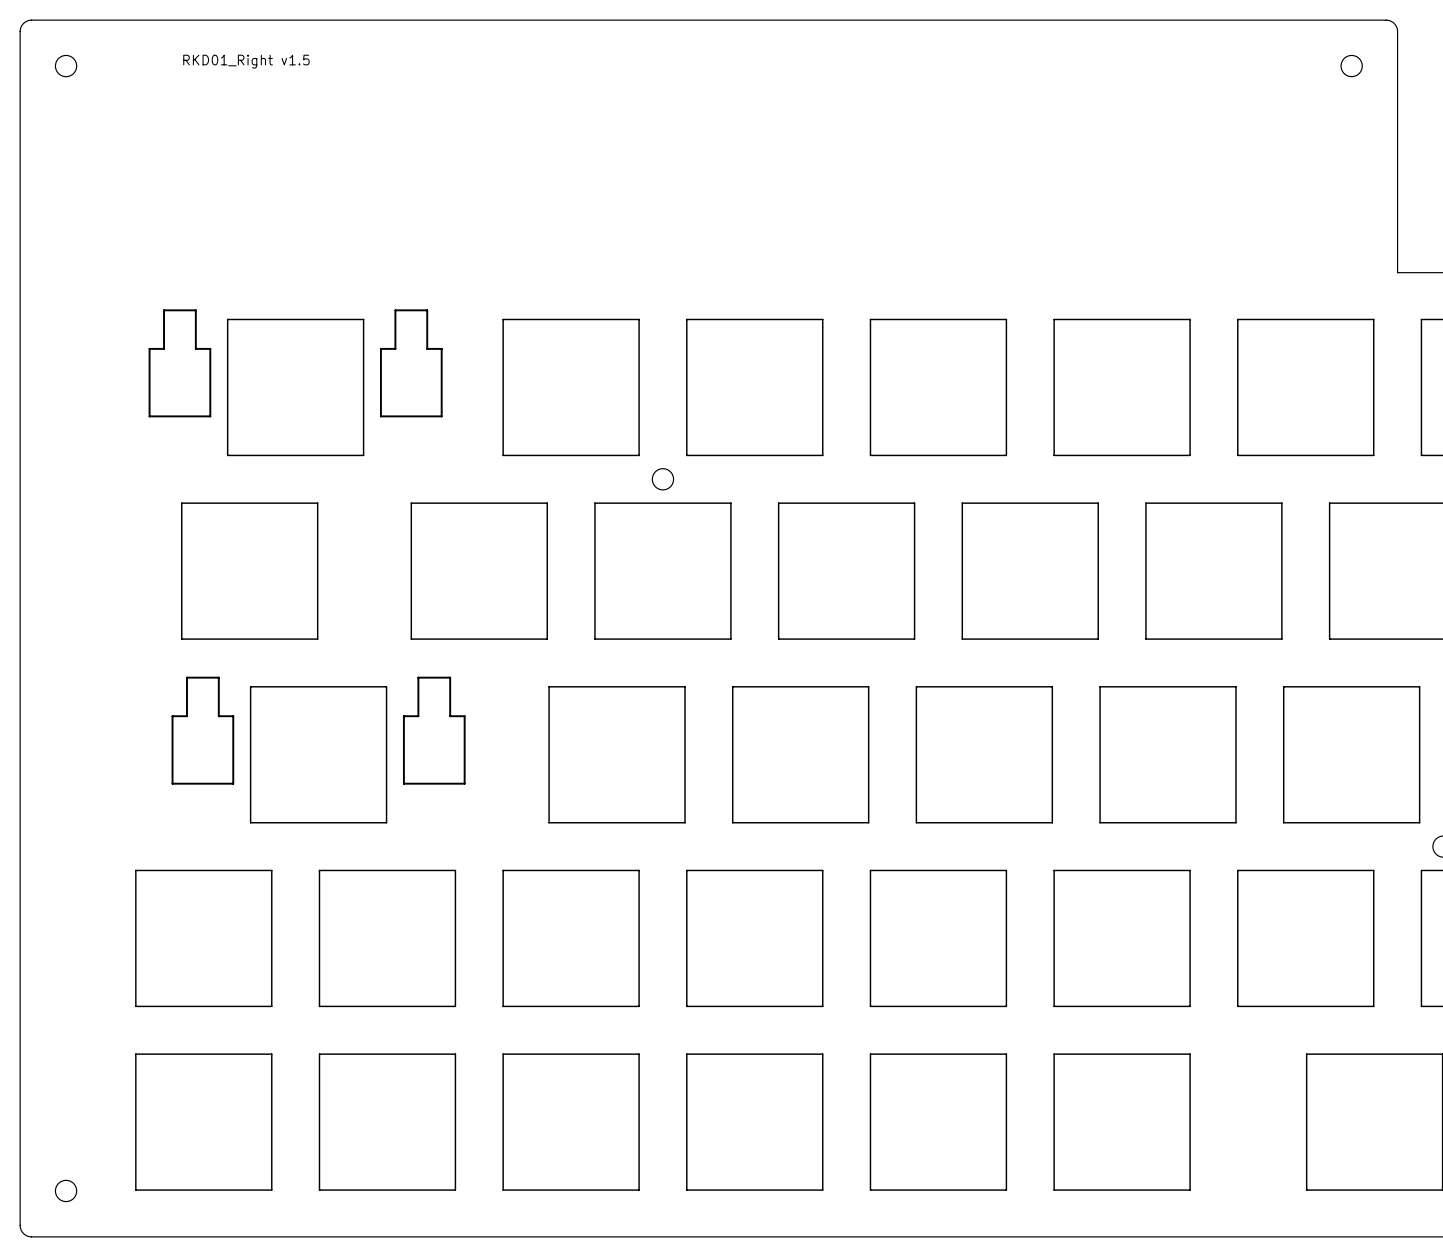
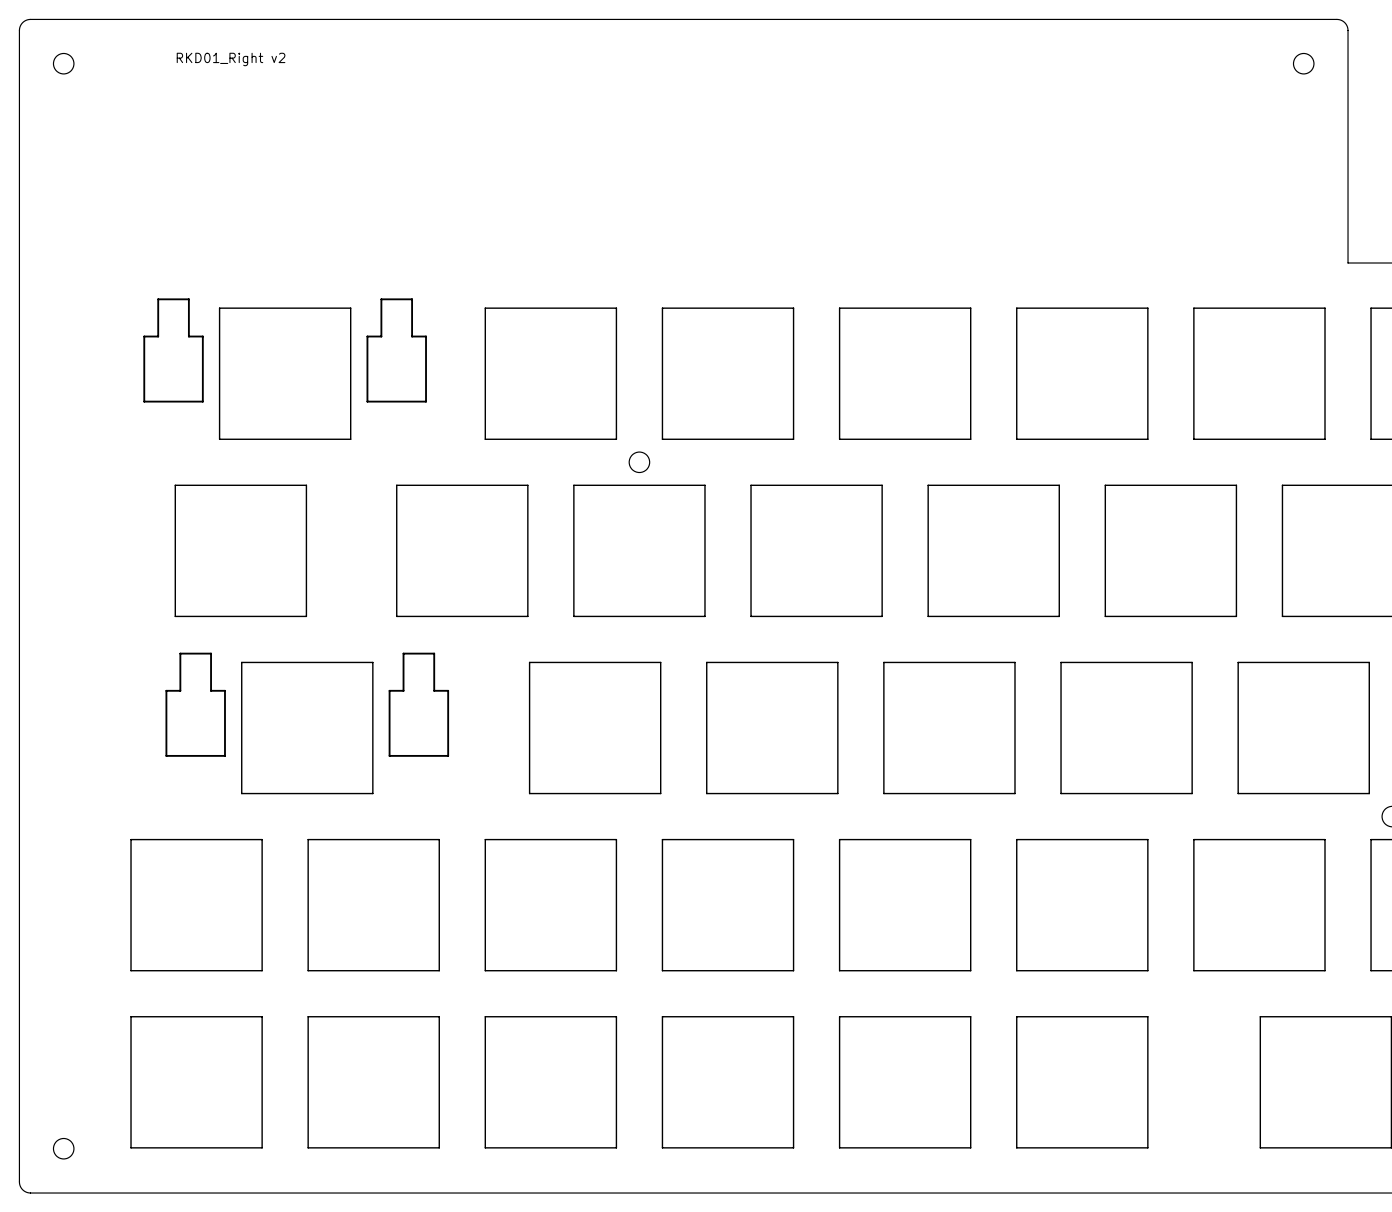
text: RKD01_Right v1.5 (246, 61) -> RKD01_Right v2 (231, 59)

